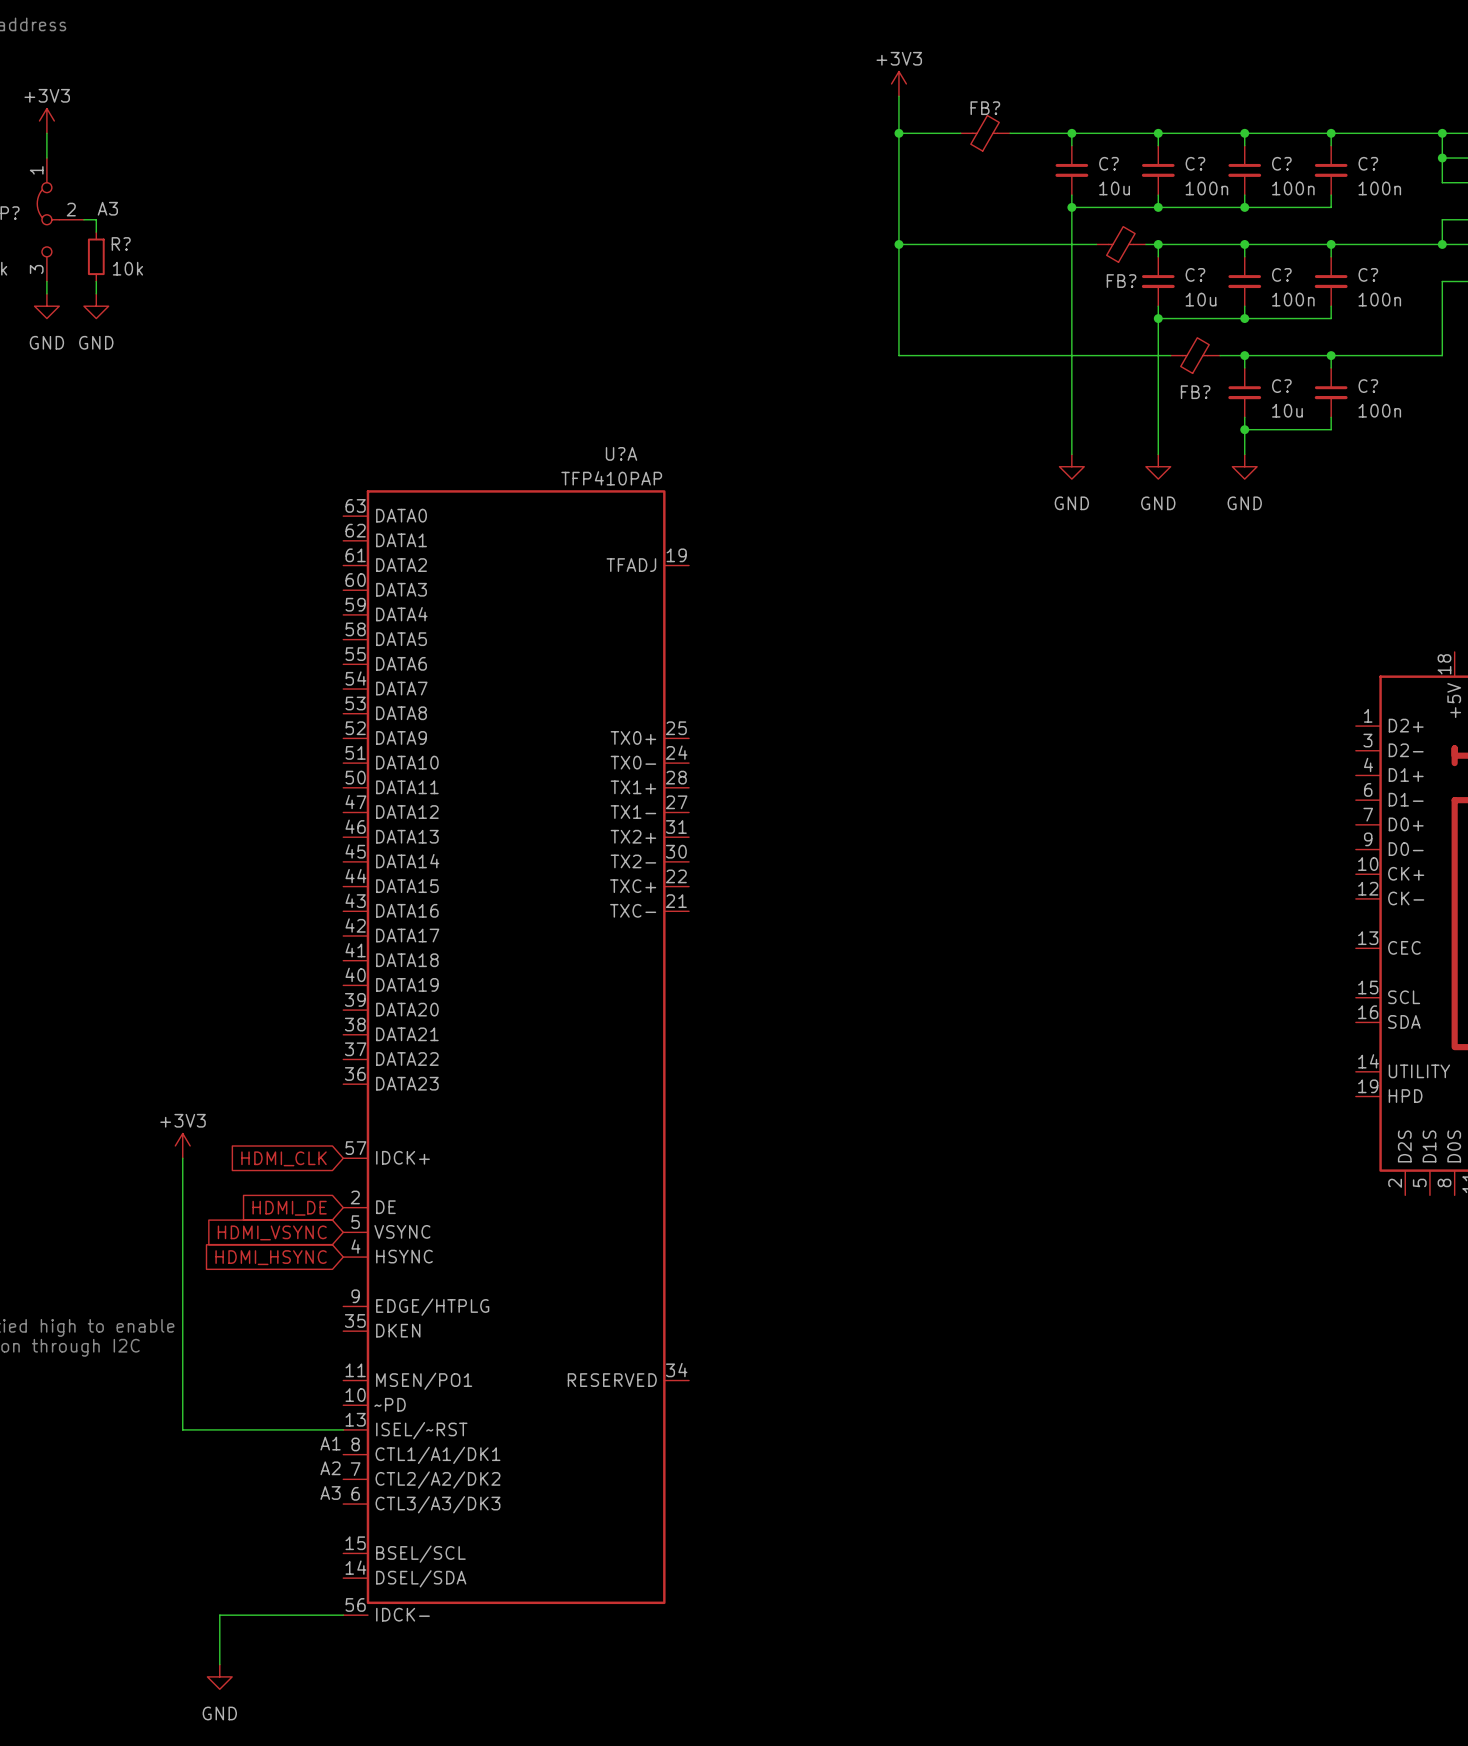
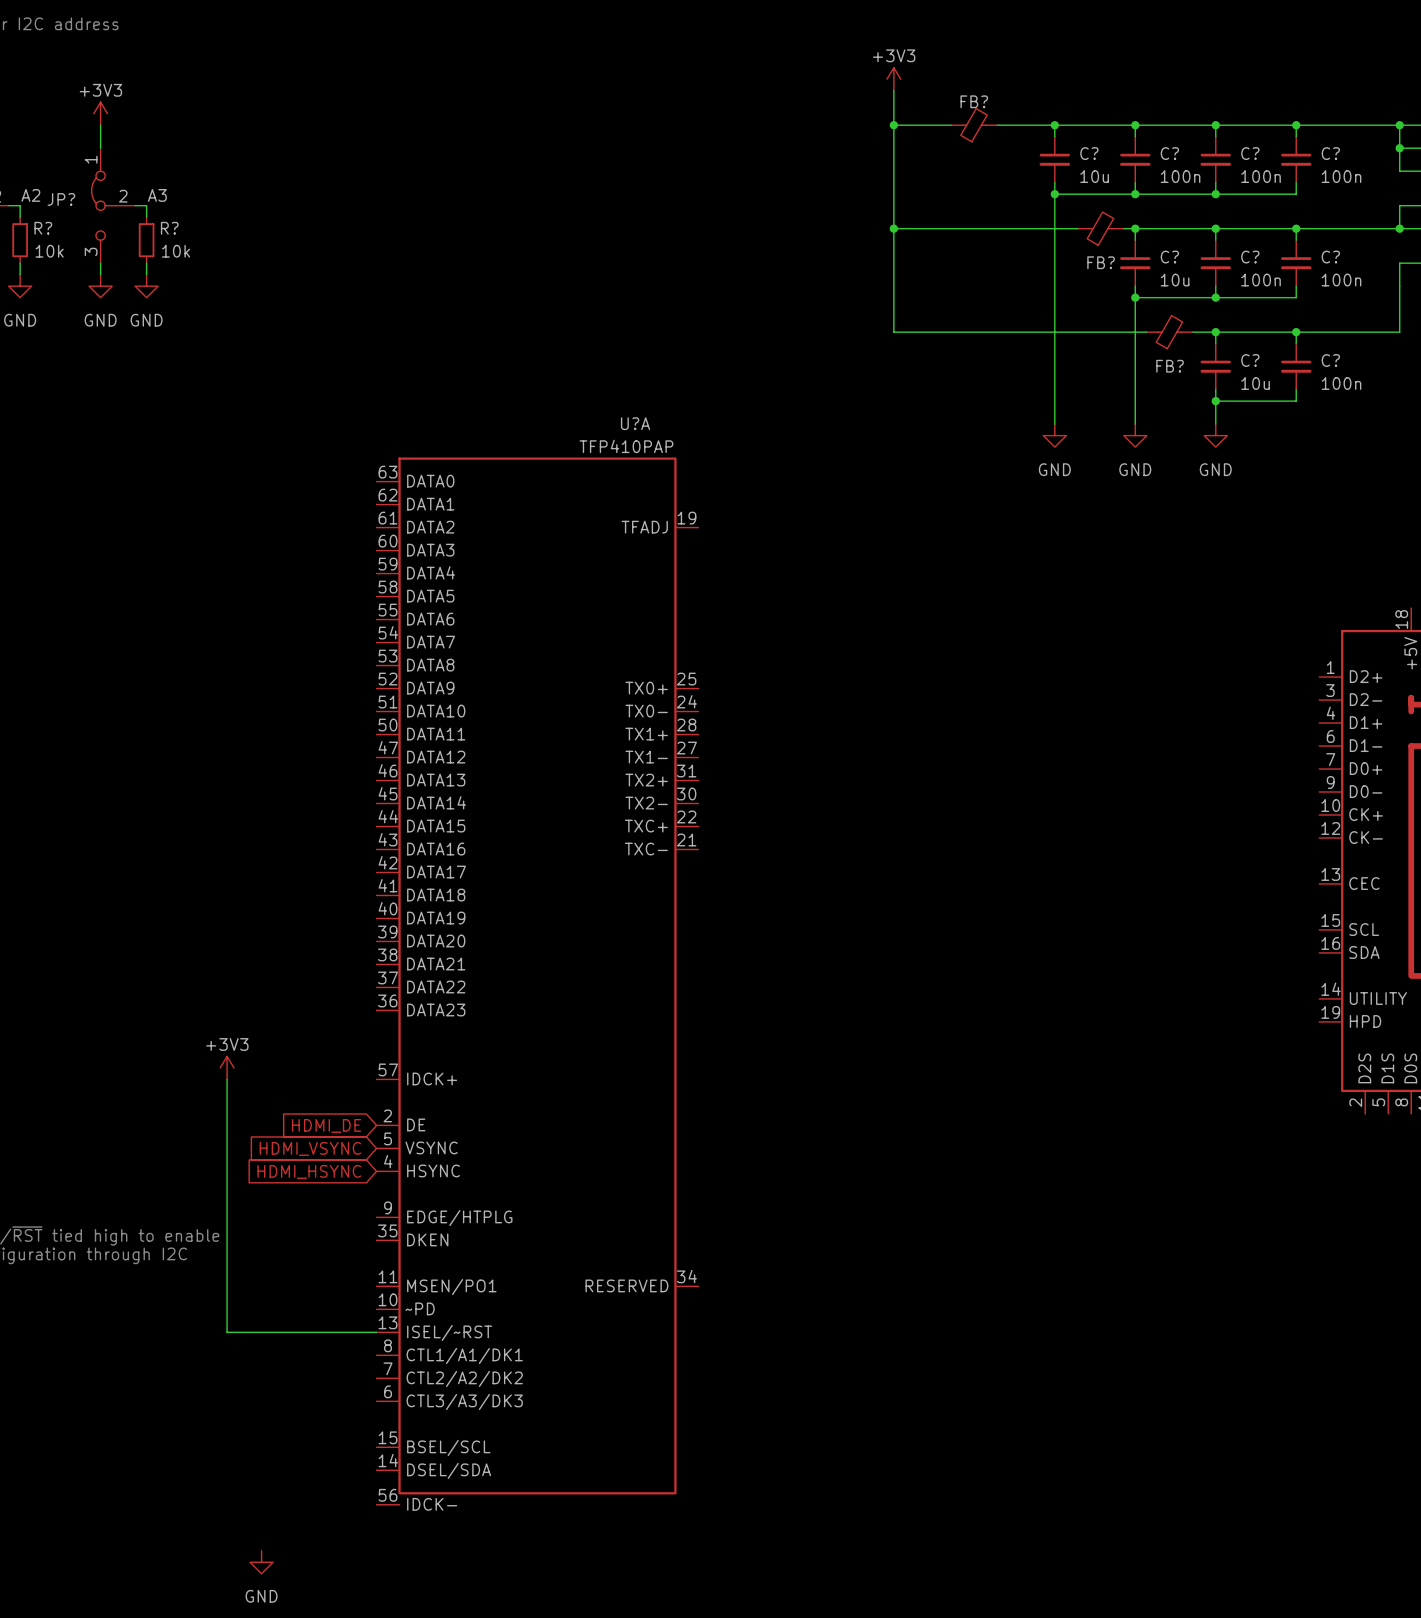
global label: HDMI_CLK (284, 1158) -> none
label: A1 (330, 1443) -> none
label: A2 (330, 1468) -> none
label: A3 (330, 1493) -> none
wire: (343, 1615) (219, 1615) (219, 1664) -> none

